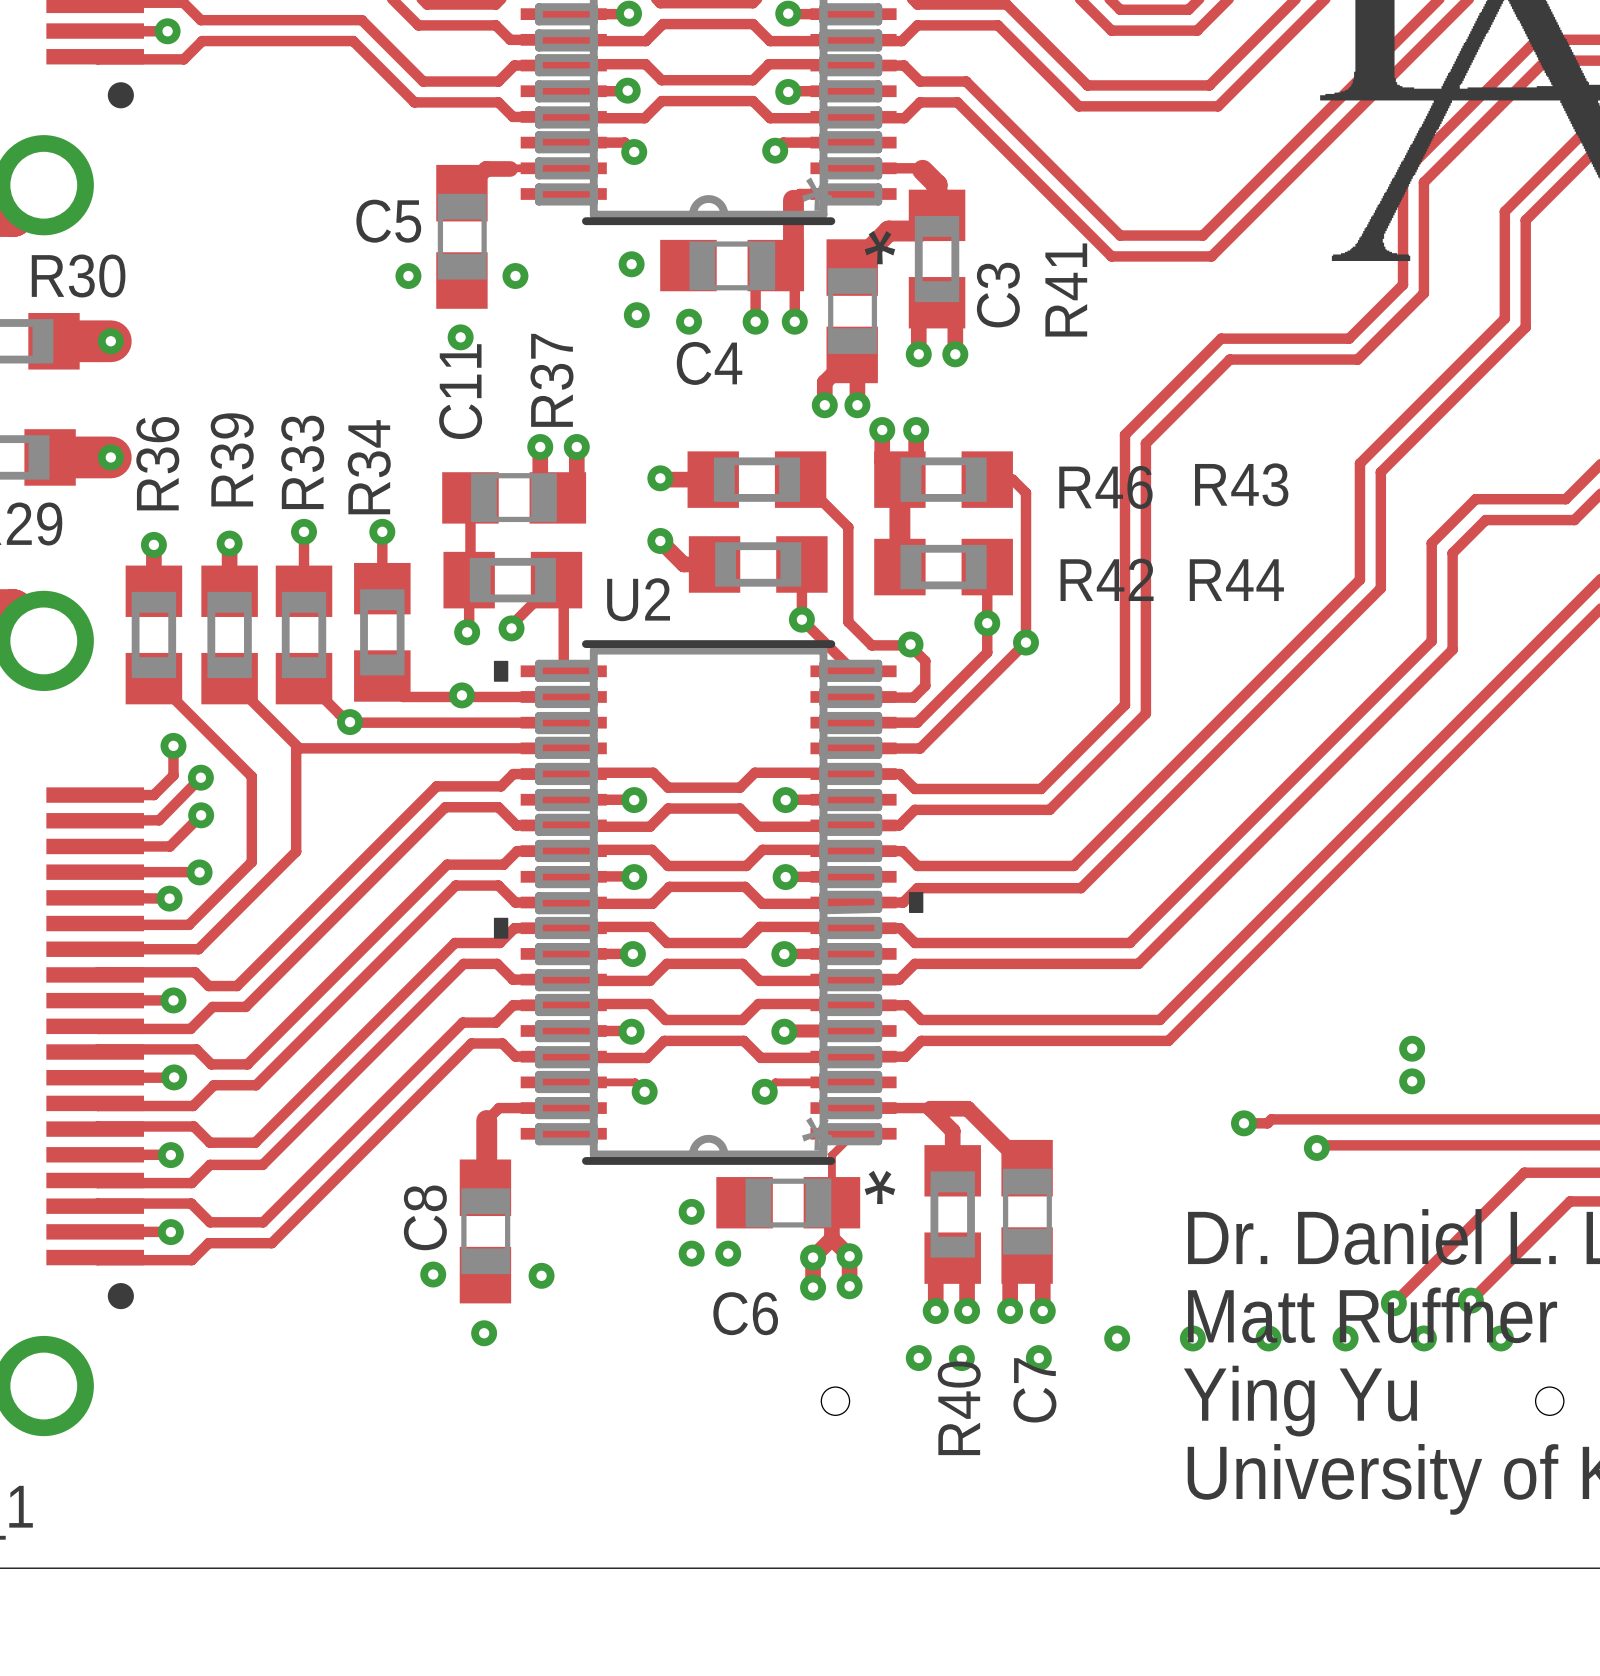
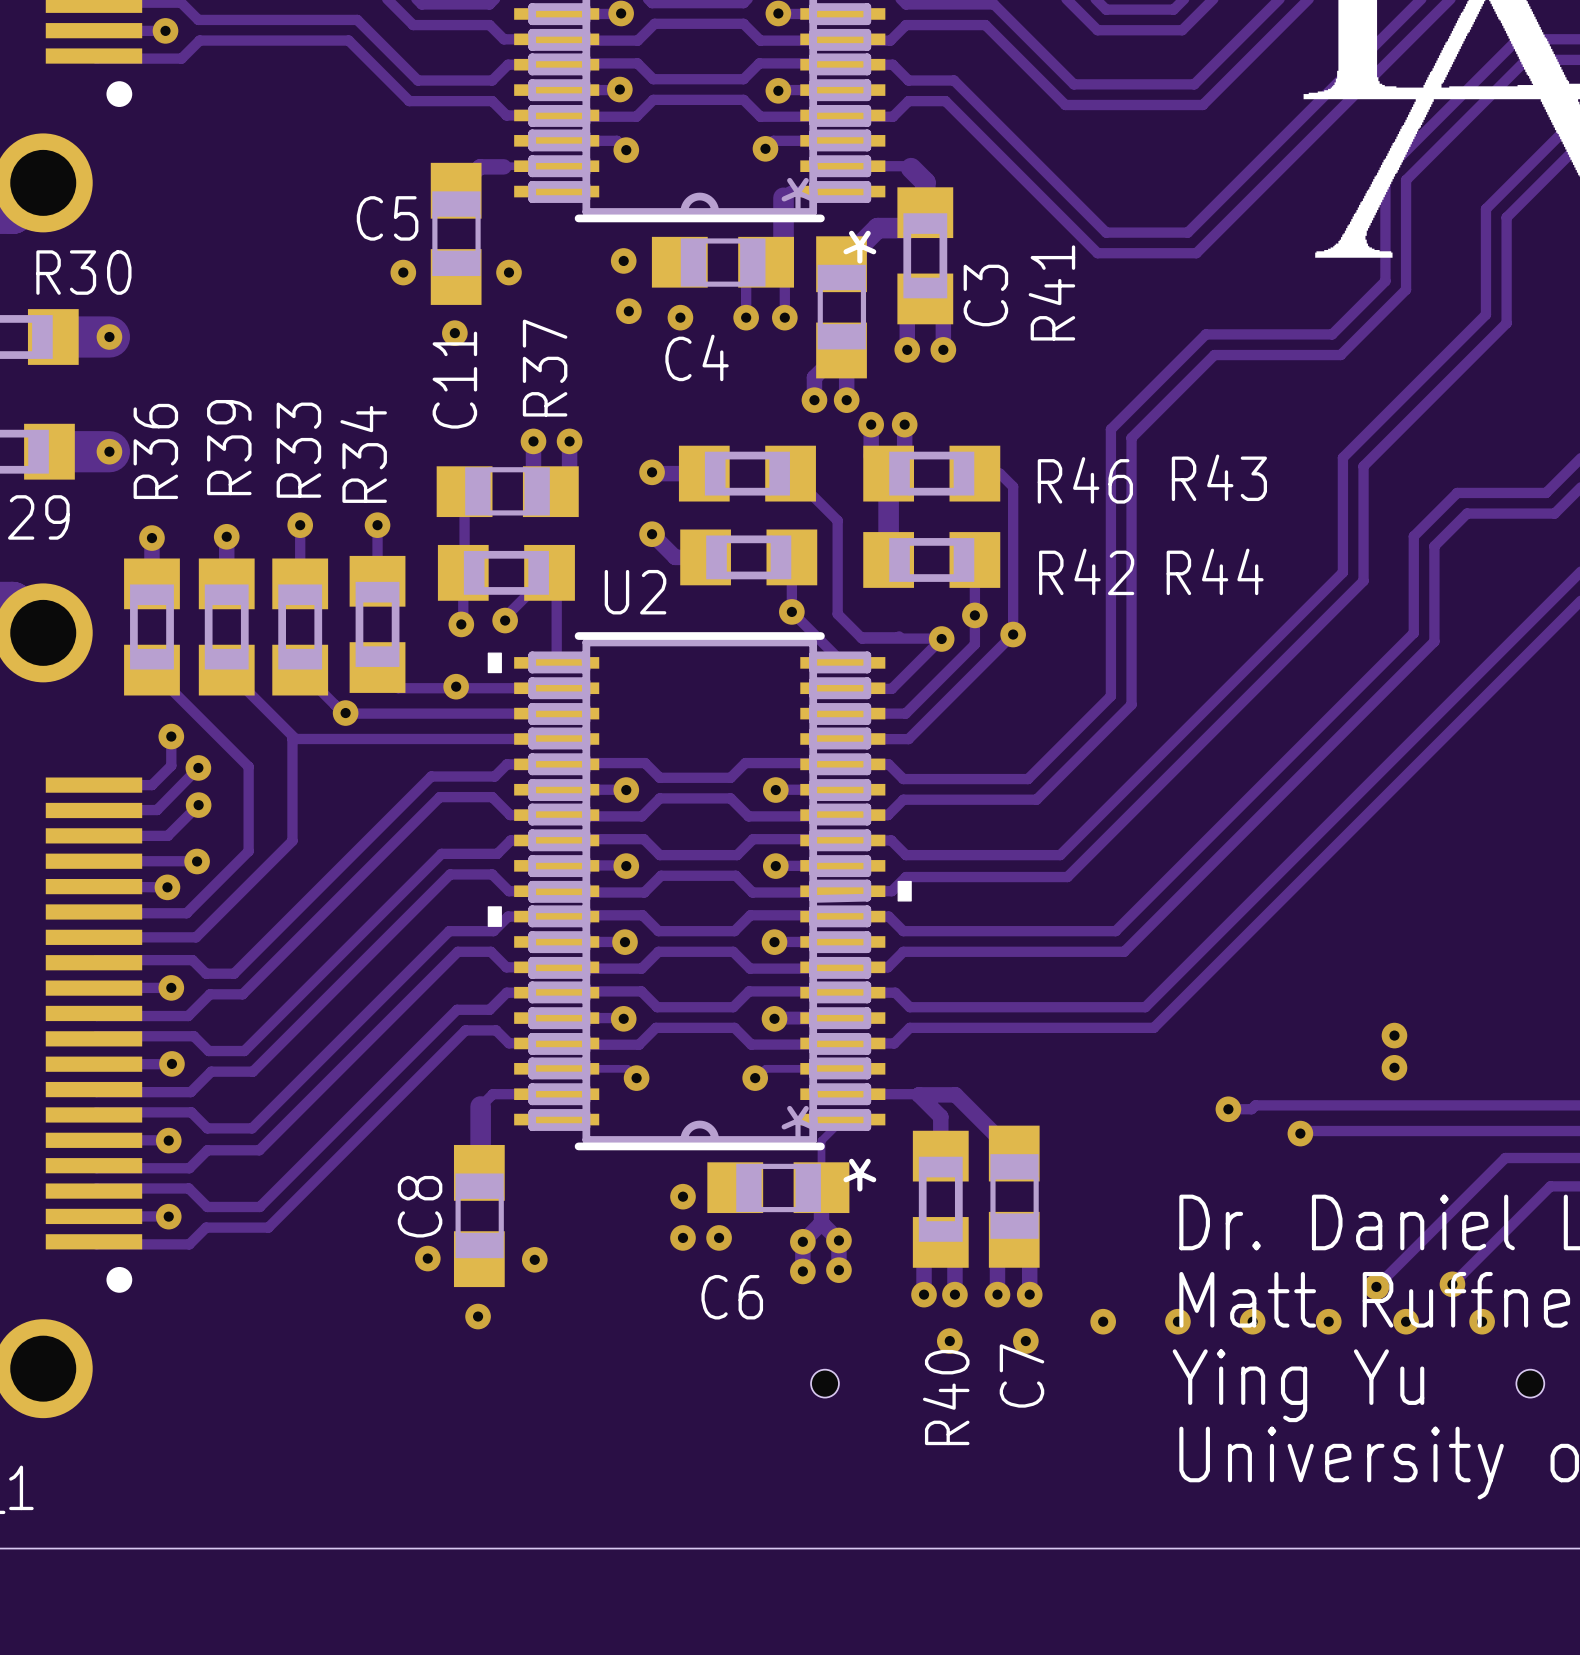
via position: (910, 644) -> (941, 638)
track: (909, 645) (925, 661) (925, 685) (913, 697) (903, 697) -> (860, 637) (942, 638) (891, 688)
via: (918, 1358) -> none

